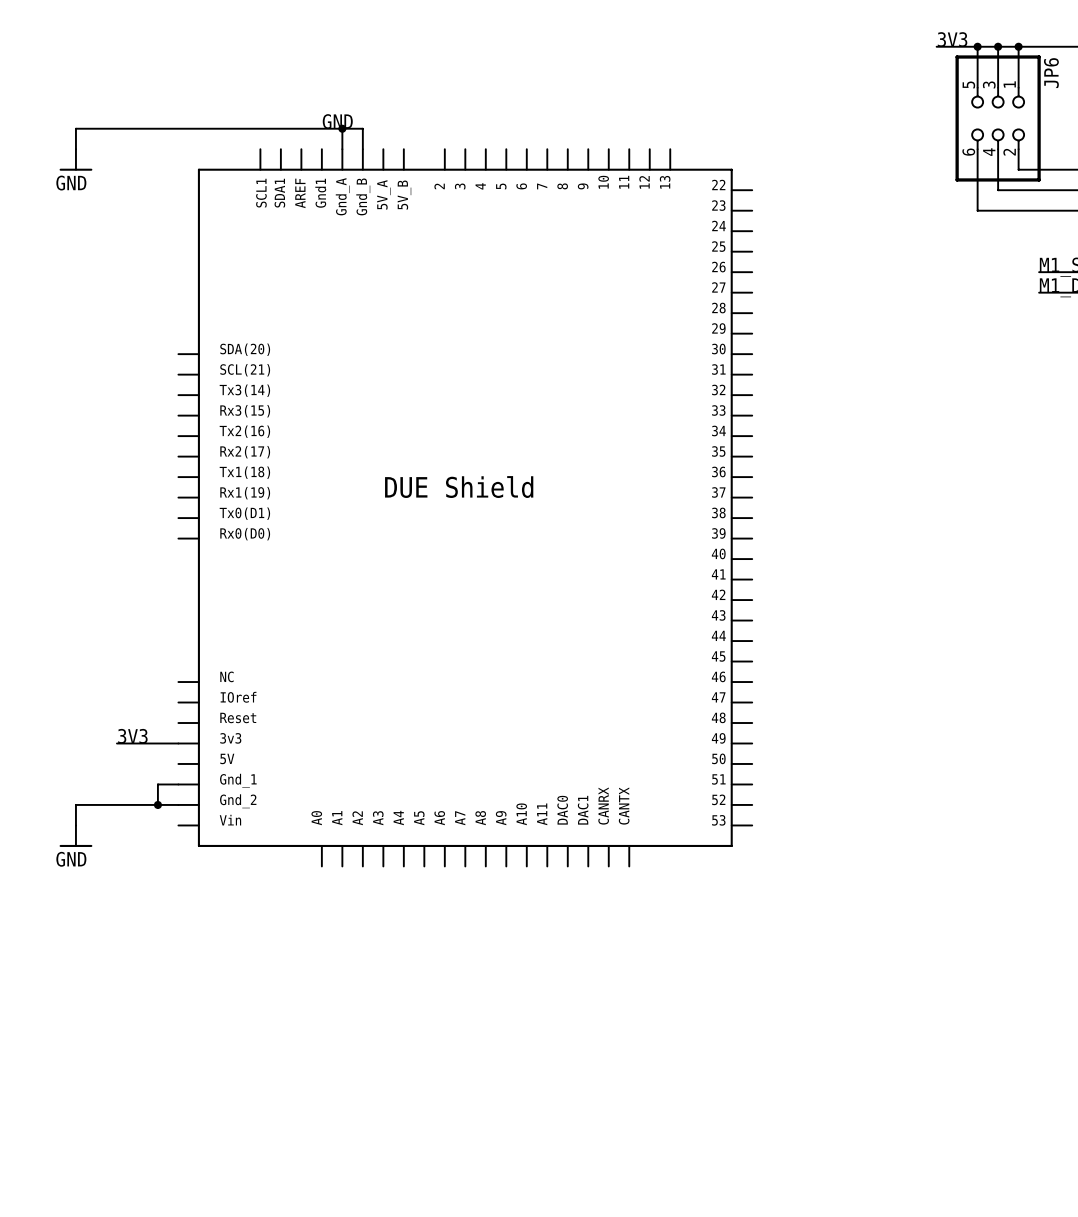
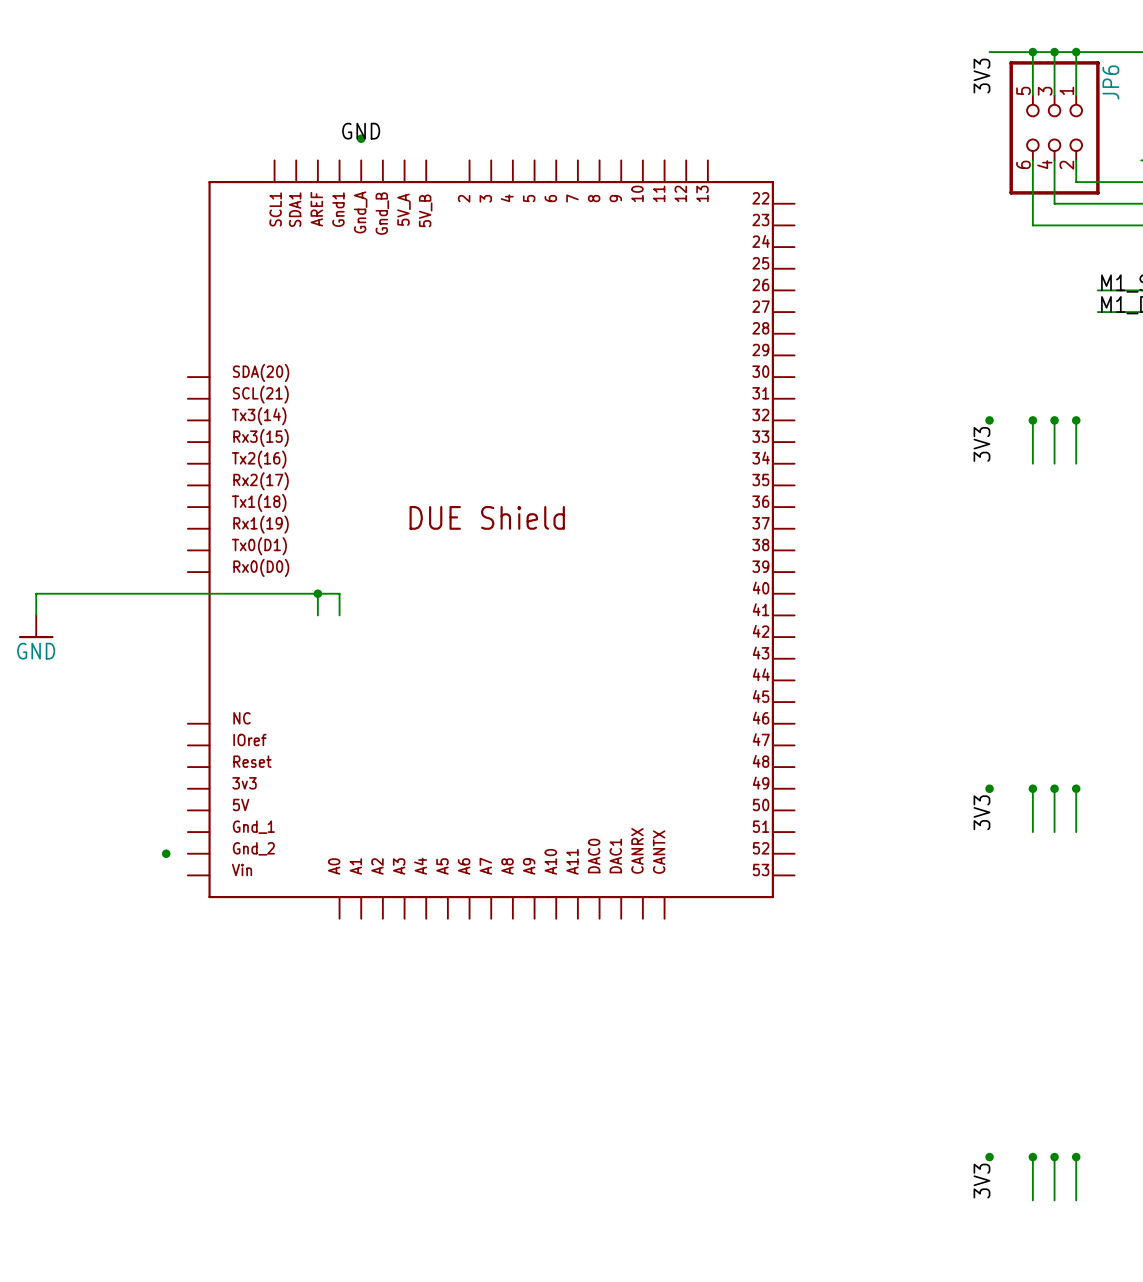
label rotation: 0° (952, 39) -> 90° counterclockwise (981, 76)
wire: (342, 128) (342, 149) -> none
wire: (75, 149) (75, 128) (362, 128) (362, 149) -> none
power symbol: GND (75, 159) -> none
junction: none -> (989, 420)
wire: none -> (1032, 420) (1032, 463)
junction: none -> (1032, 420)
wire: none -> (1054, 420) (1054, 463)
junction: none -> (1054, 420)
wire: none -> (1076, 420) (1076, 463)
junction: none -> (1076, 420)
label: none -> 3V3 (981, 444)
wire: none -> (317, 593) (317, 615)
junction: none -> (317, 593)
wire: none -> (36, 615) (36, 593) (339, 593) (339, 615)
power symbol: none -> GND (36, 626)
label: 3V3 (132, 736) -> none
wire: (116, 743) (178, 743) -> none
junction: none -> (989, 788)
wire: none -> (1032, 788) (1032, 832)
junction: none -> (1032, 788)
wire: none -> (1054, 788) (1054, 832)
junction: none -> (1054, 788)
wire: none -> (1076, 788) (1076, 832)
junction: none -> (1076, 788)
label: none -> 3V3 (981, 812)
wire: (178, 784) (157, 784) (157, 804) -> none
wire: (178, 804) (75, 804) (75, 825) -> none
power symbol: GND (75, 836) -> none
junction: none -> (989, 1157)
wire: none -> (1032, 1157) (1032, 1200)
junction: none -> (1032, 1157)
wire: none -> (1054, 1157) (1054, 1200)
junction: none -> (1054, 1157)
wire: none -> (1076, 1157) (1076, 1200)
junction: none -> (1076, 1157)
label: none -> 3V3 (981, 1181)

